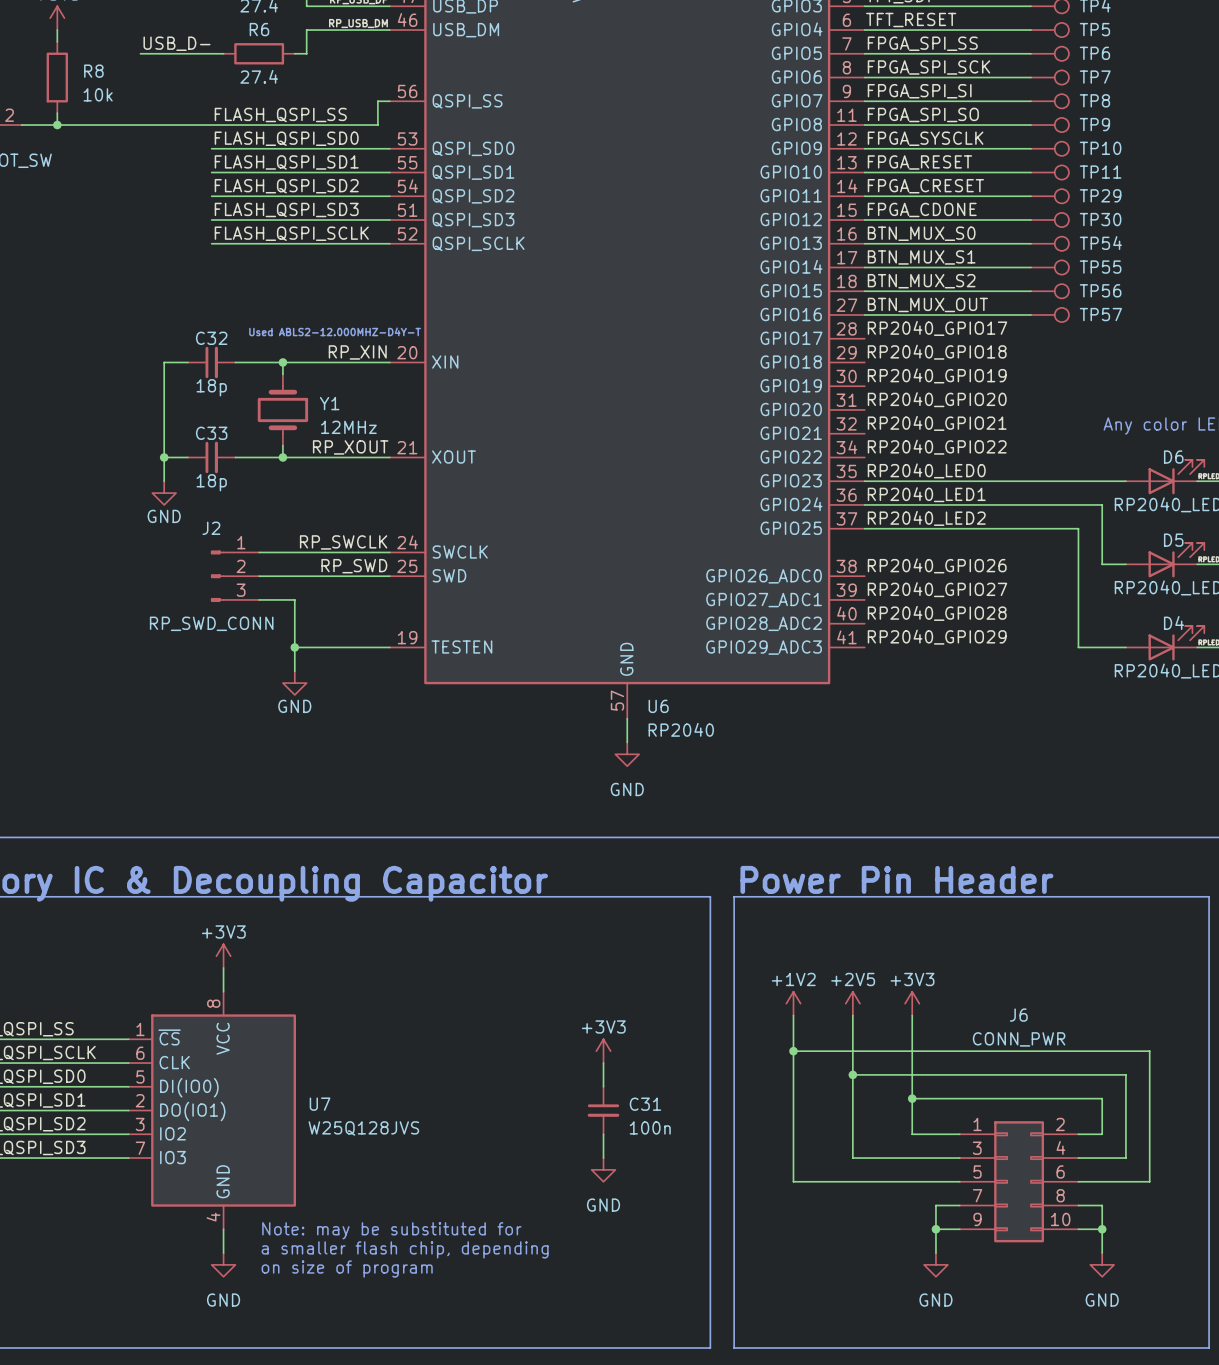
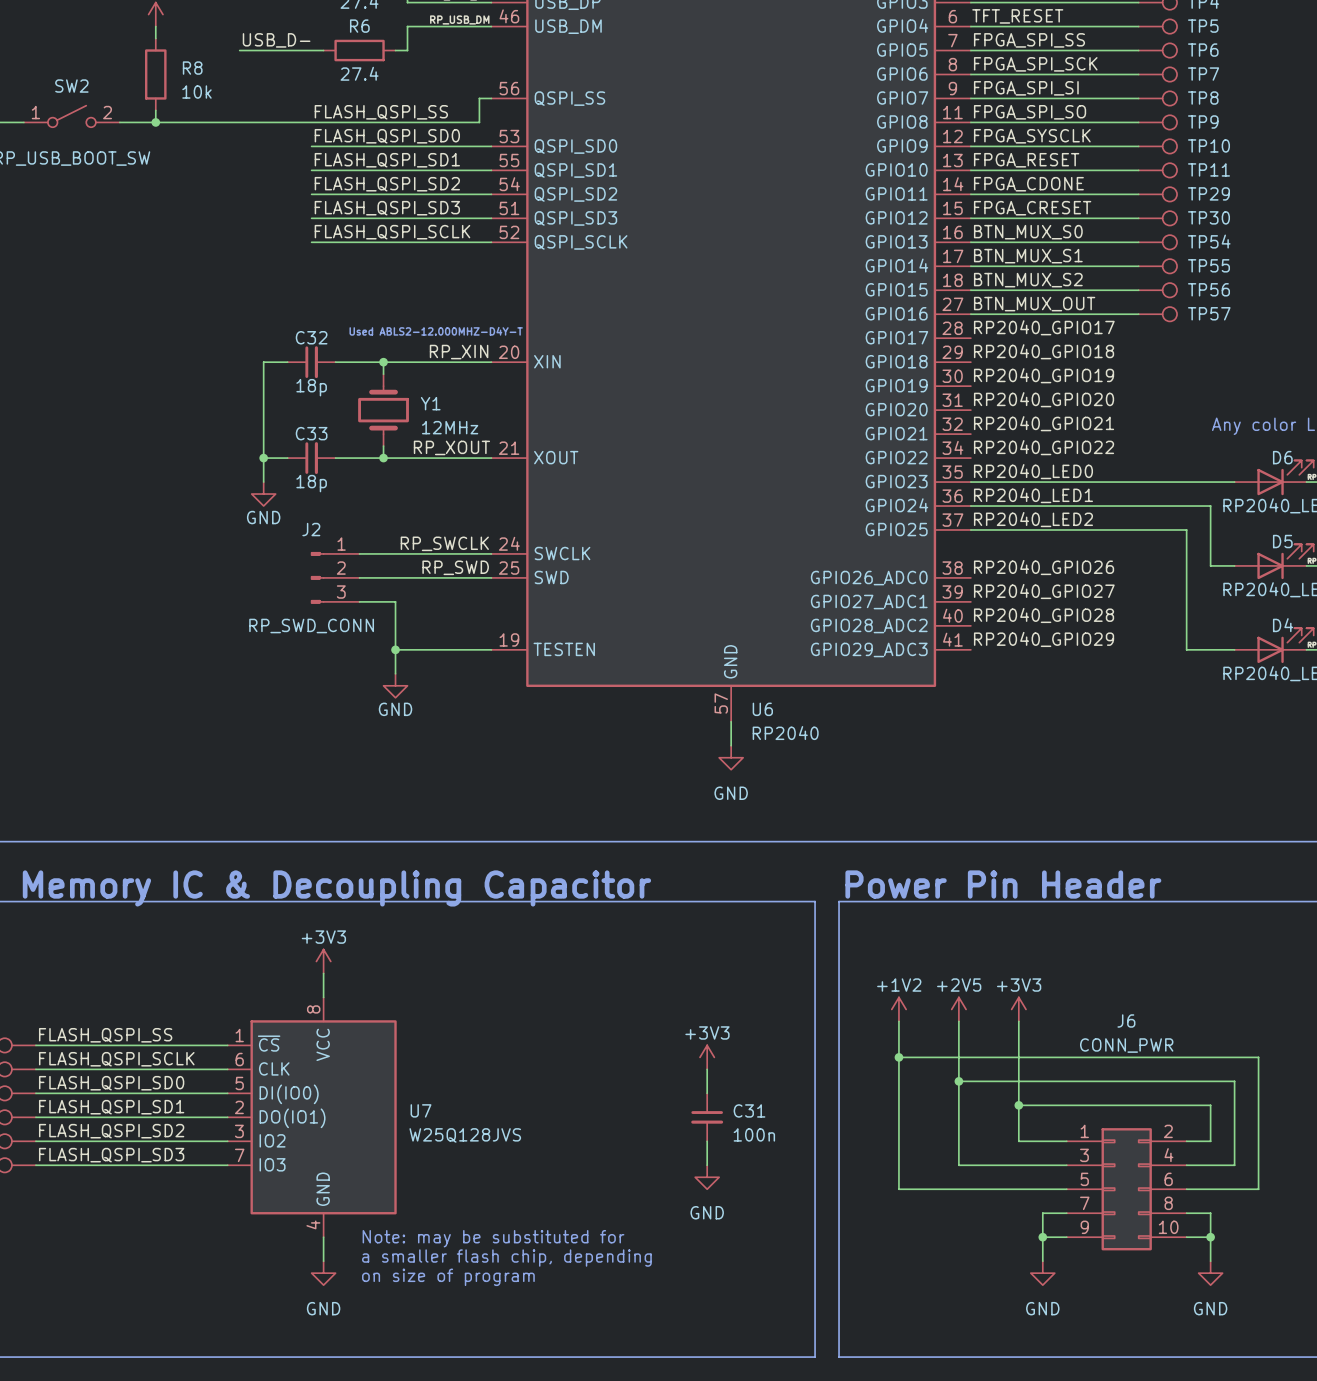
label: FPGA_CRESET (925, 186) -> FPGA_CDONE (1028, 184)
label: FPGA_CDONE (922, 209) -> FPGA_CRESET (1032, 208)

